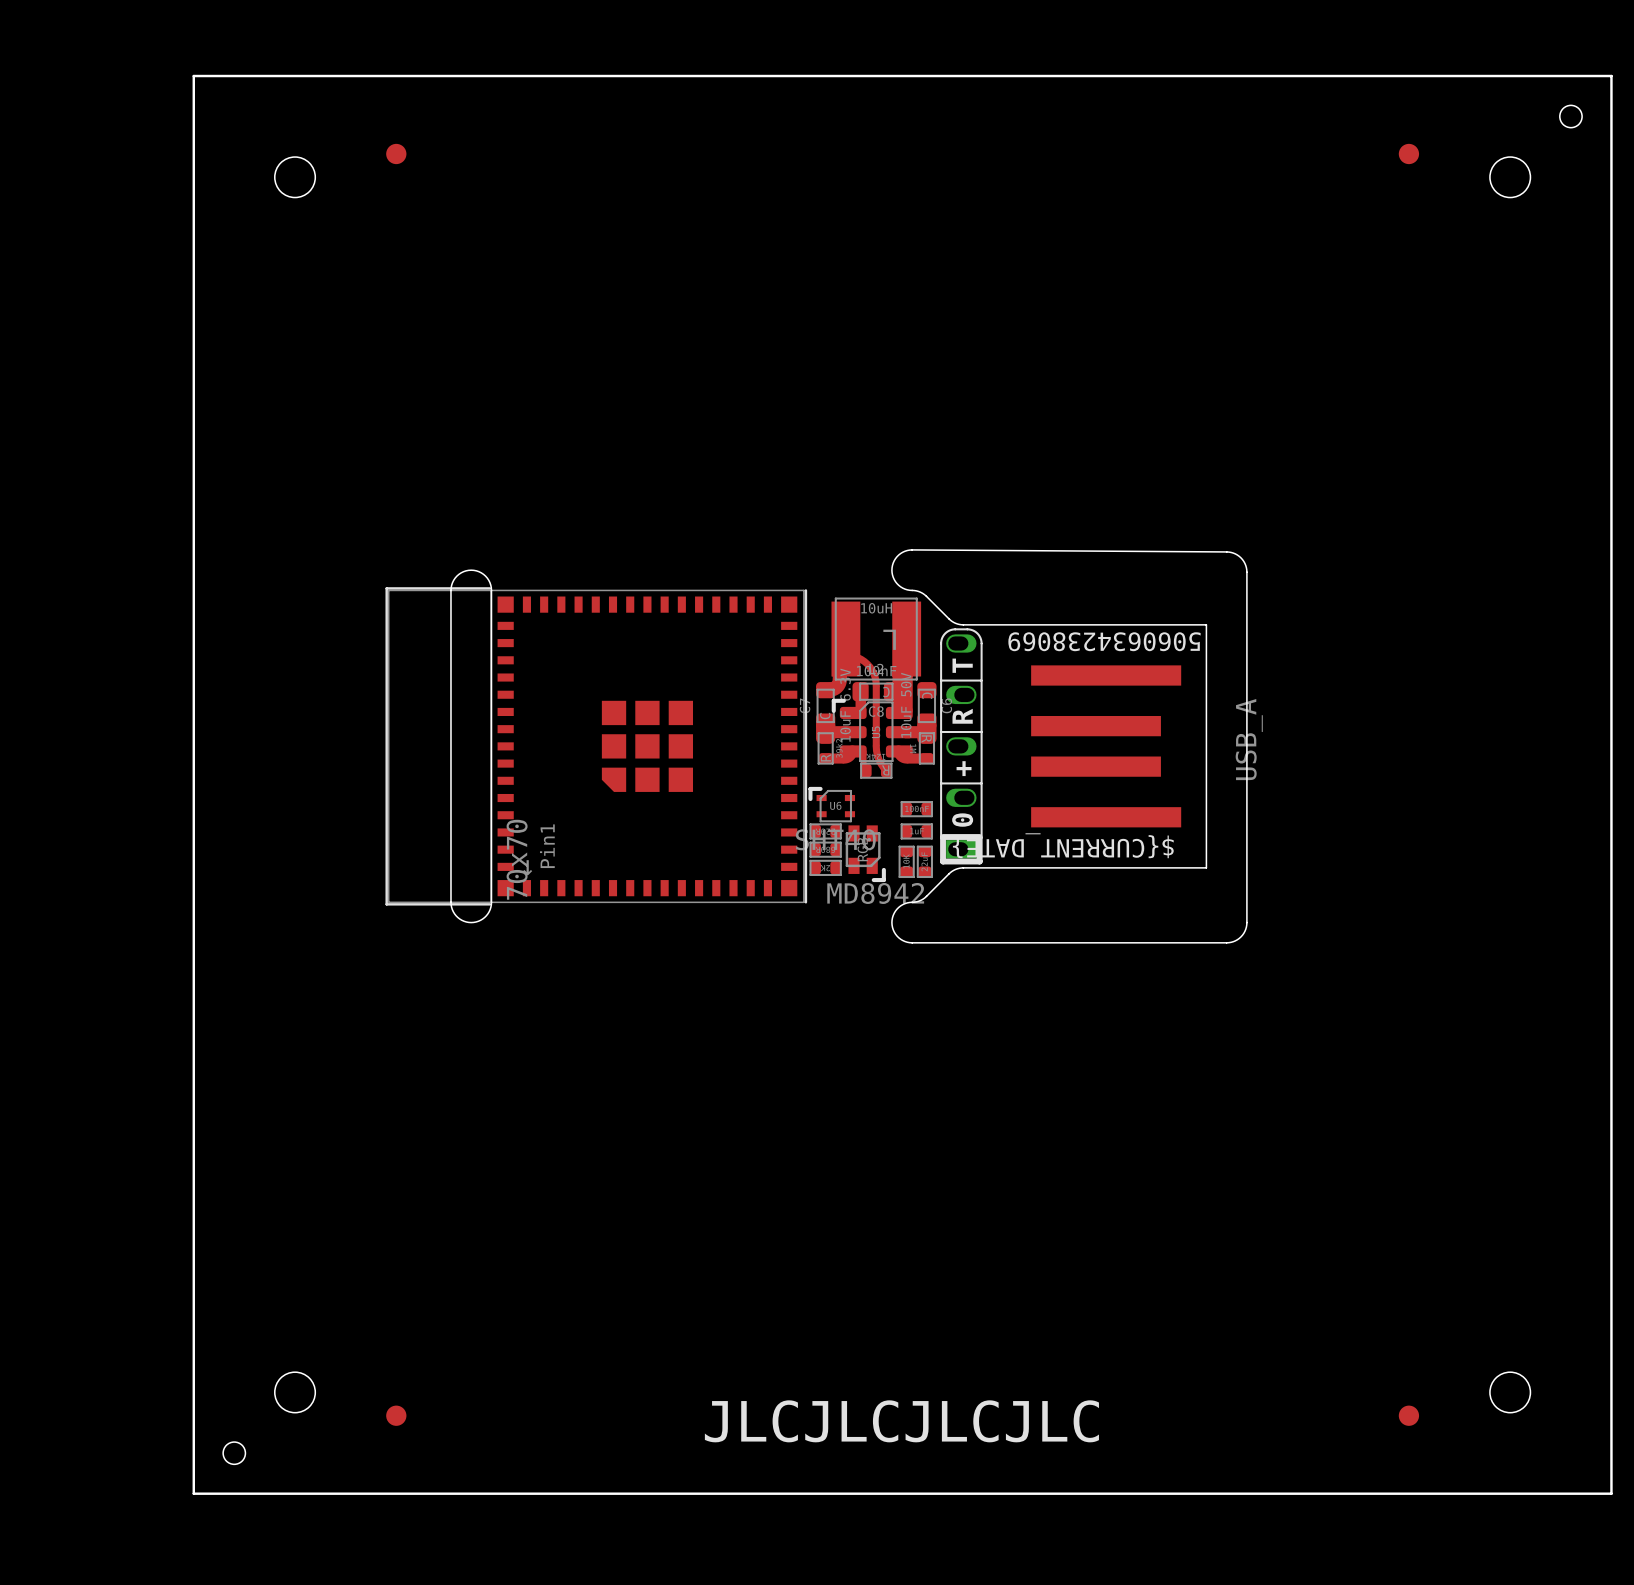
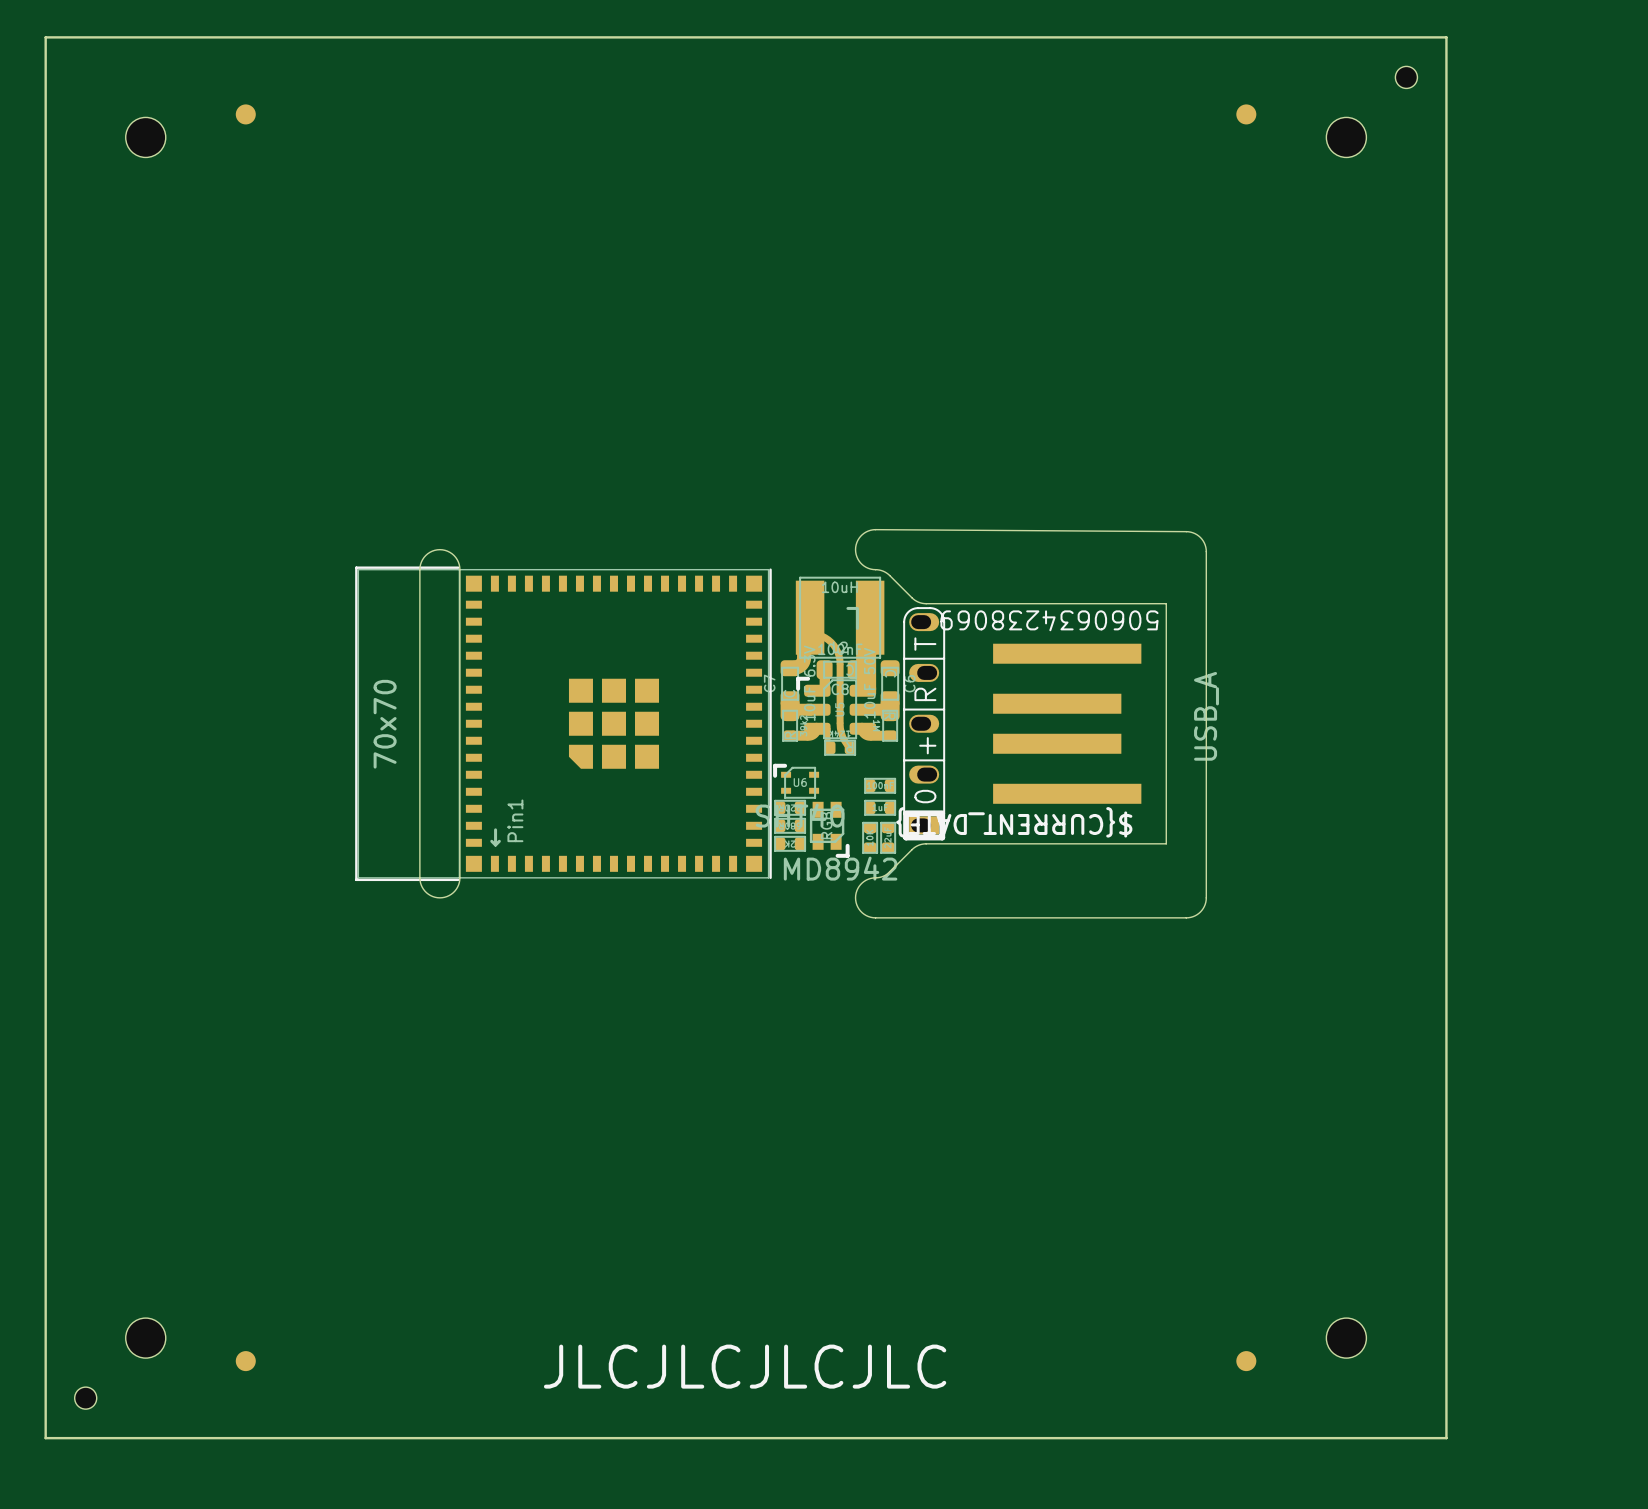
part position: (902, 784) -> (746, 737)
part value position: 70x70 (517, 859) -> 70x70 (385, 724)

